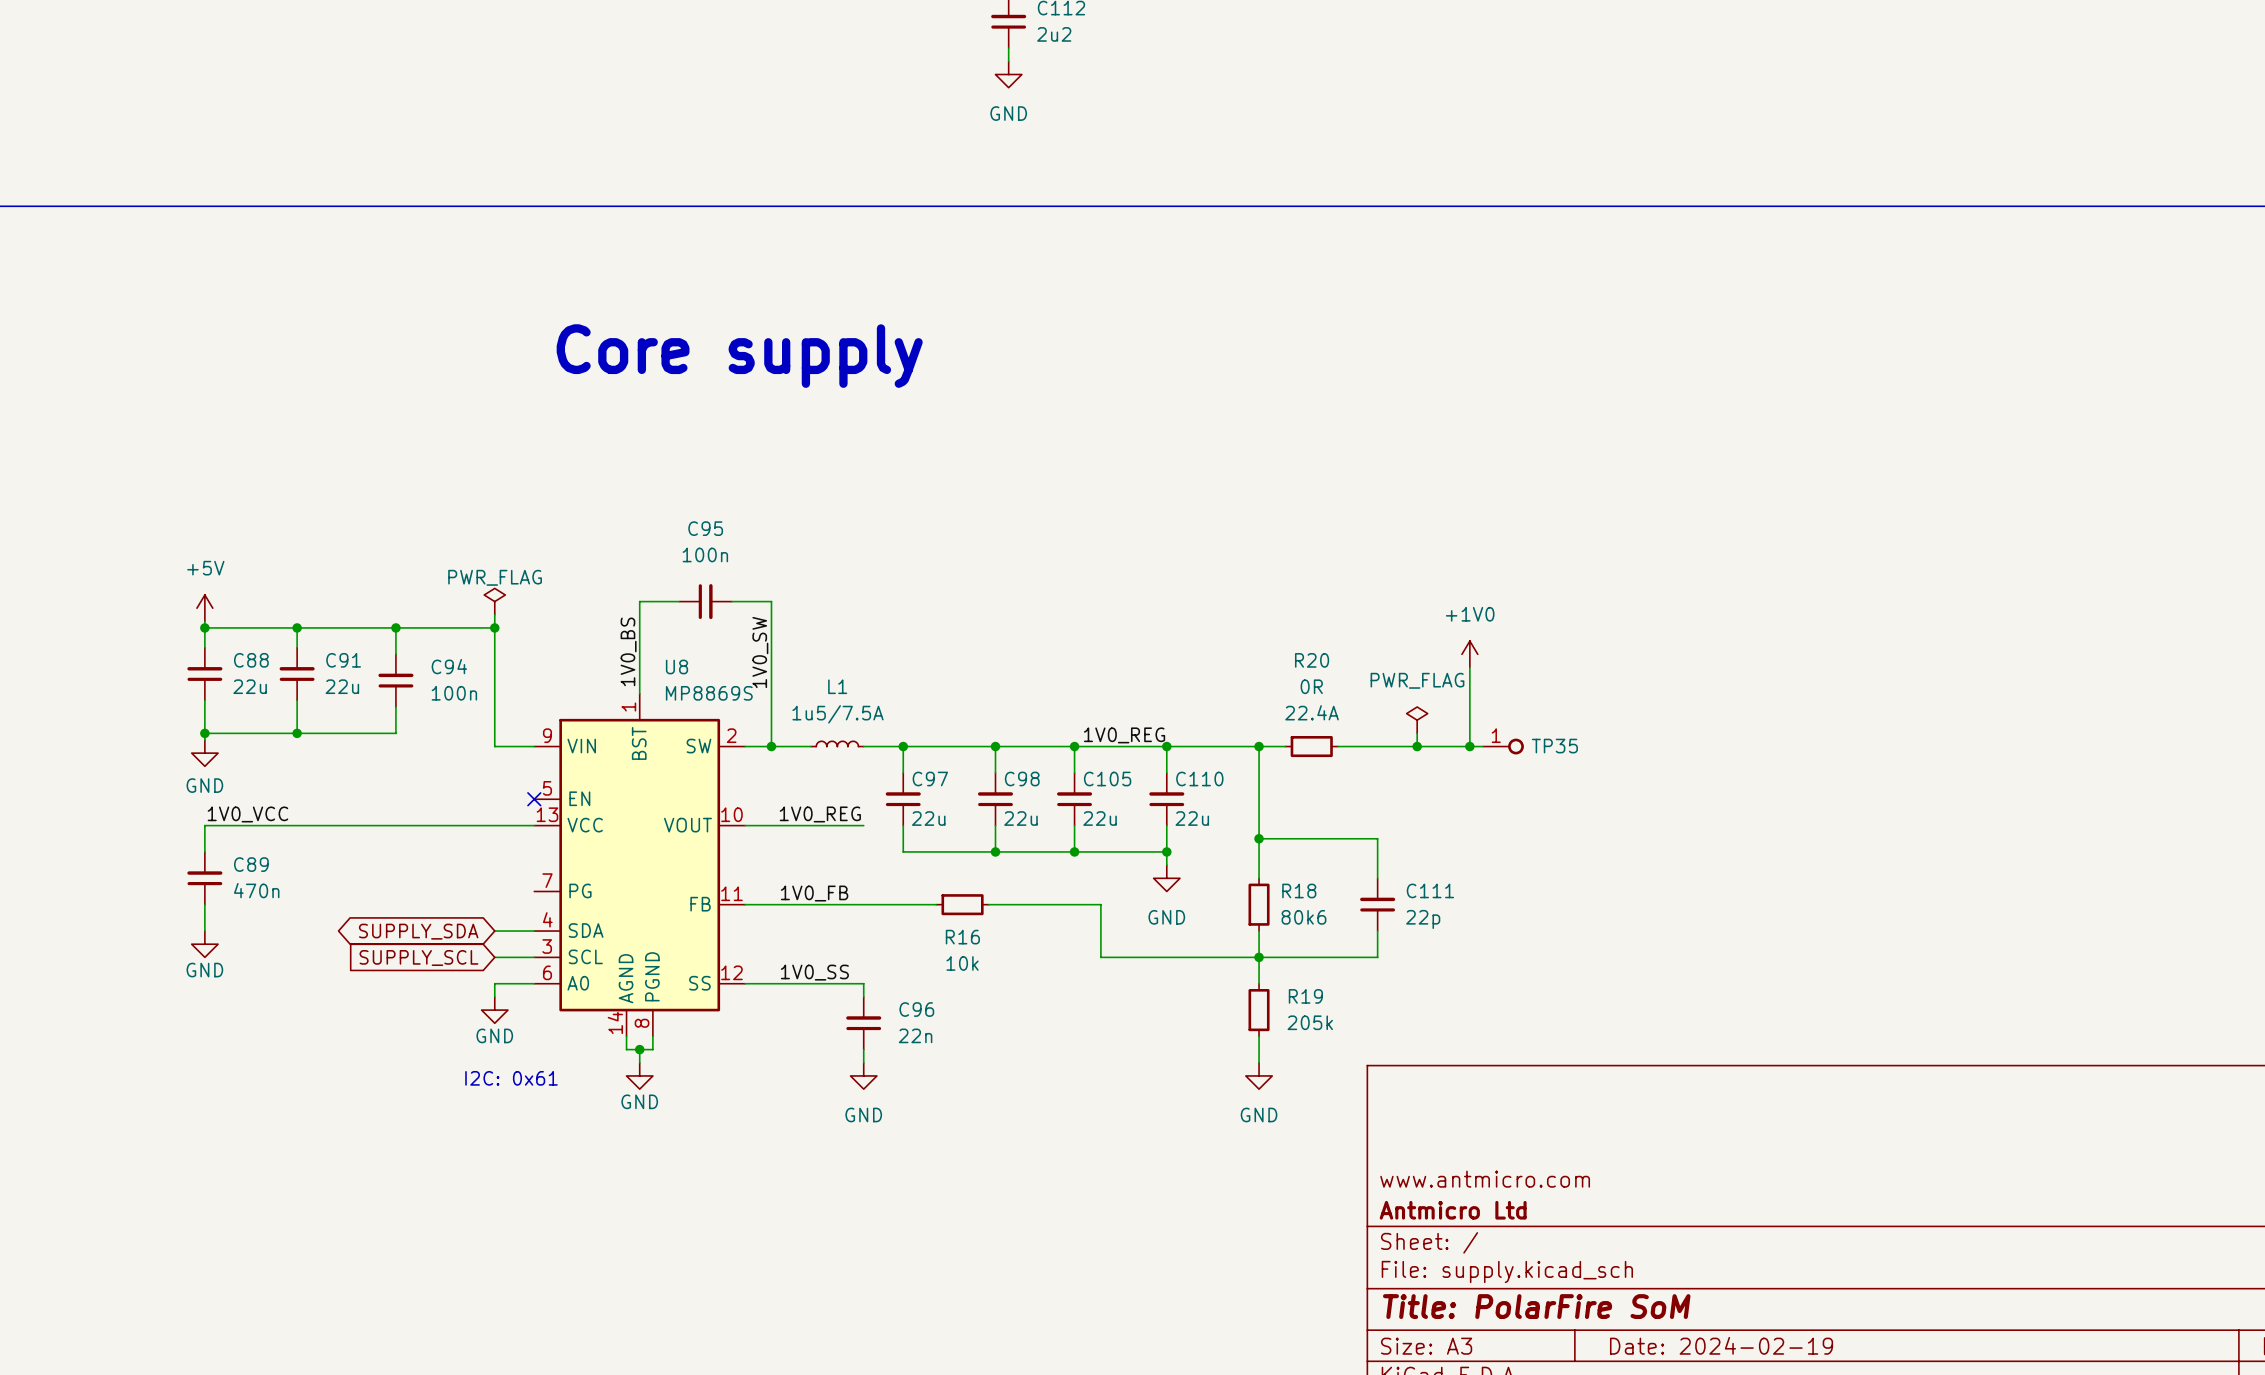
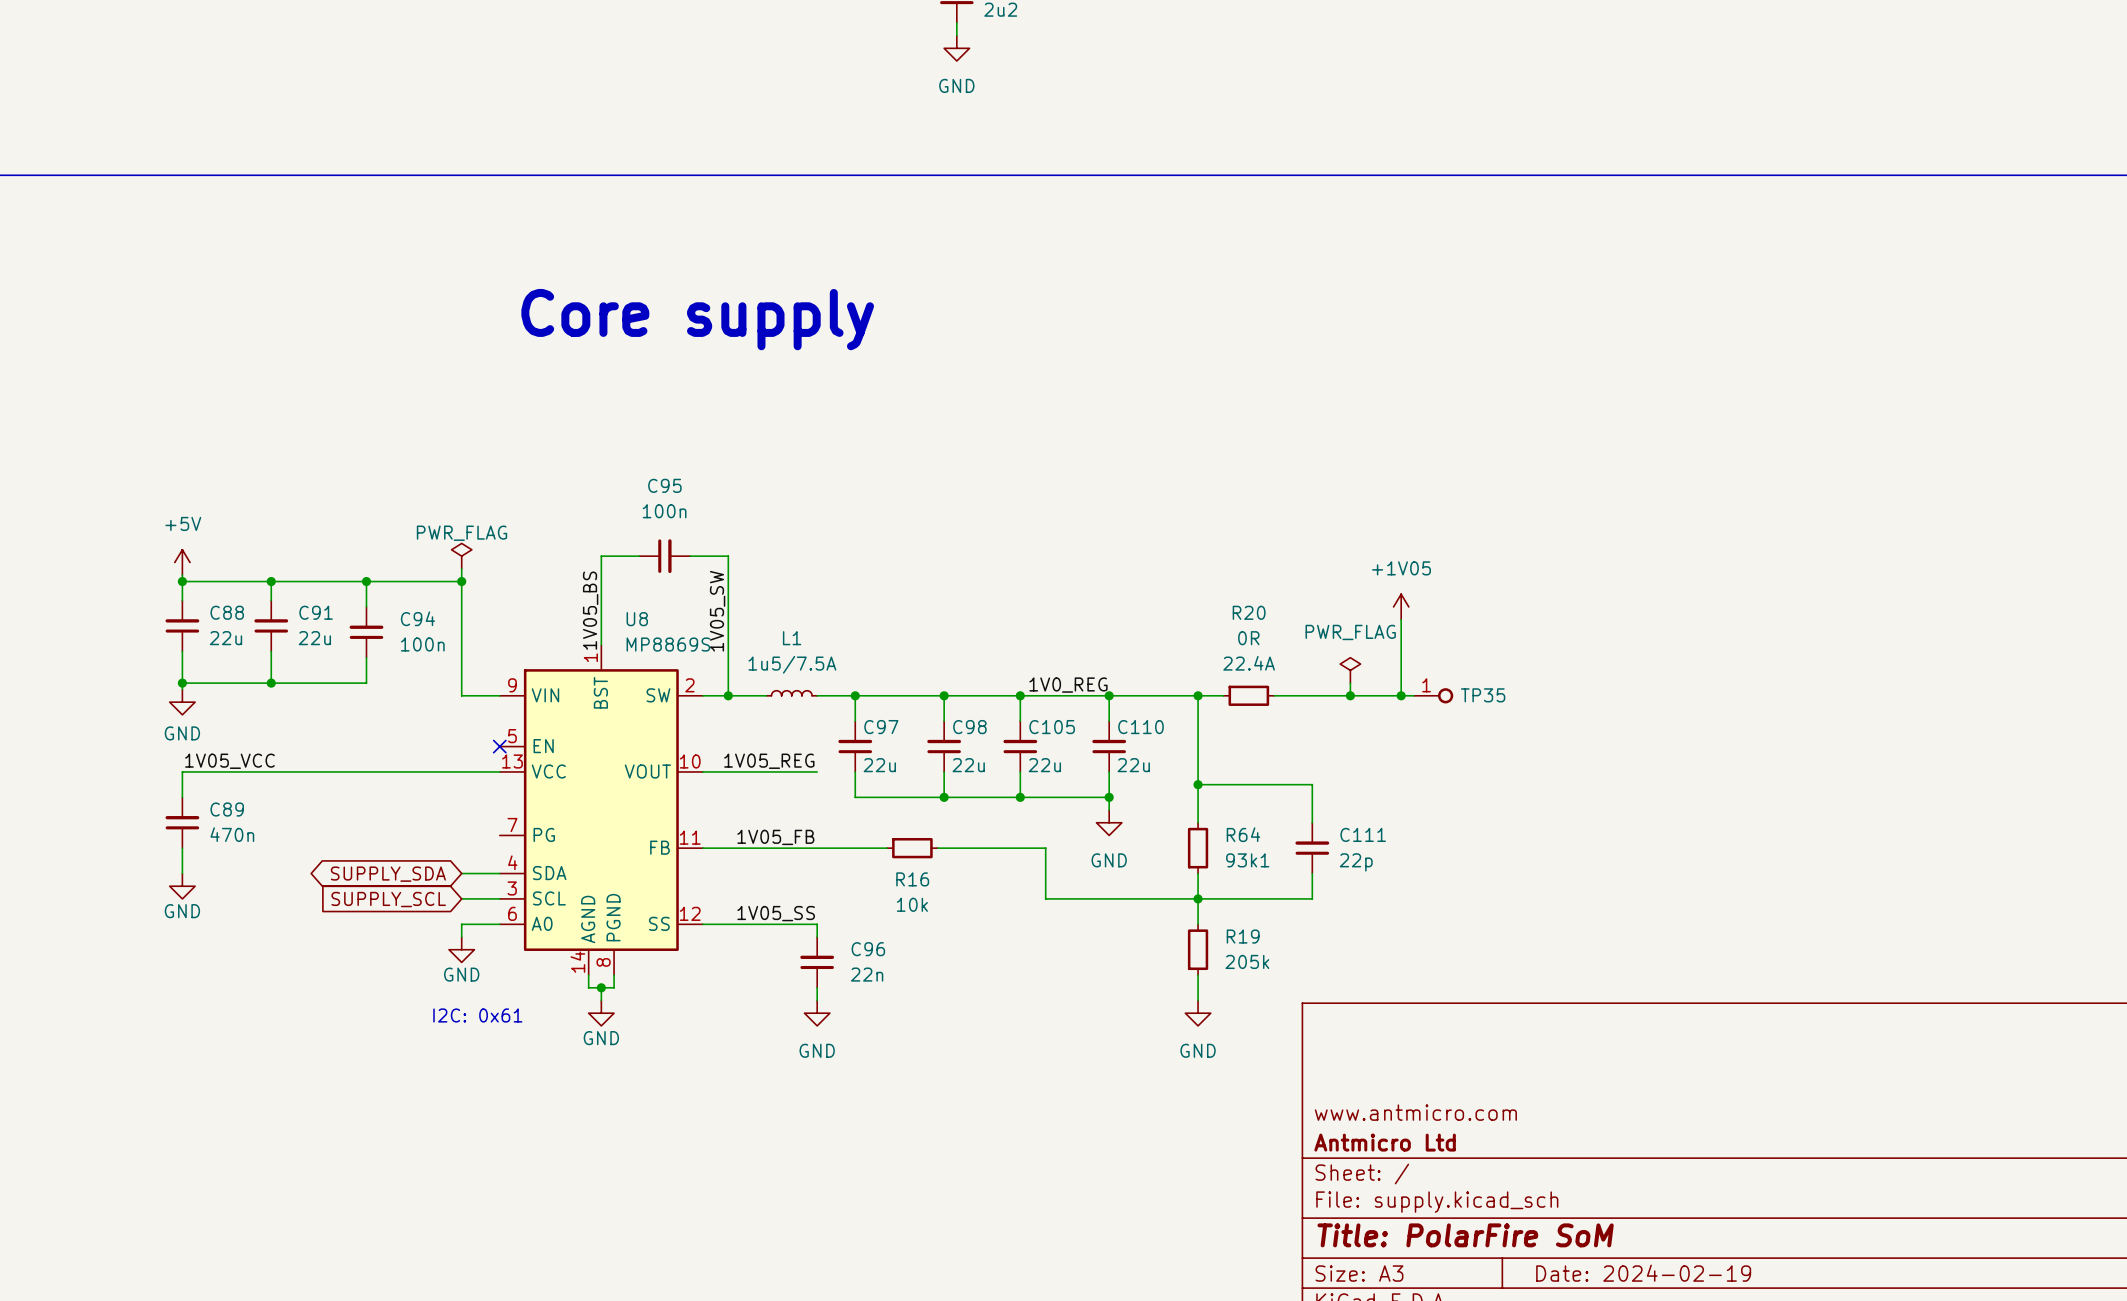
label: 1V0_BS (628, 651) -> 1V05_BS (590, 610)
label: 1V0_SW (760, 652) -> 1V05_SW (717, 611)
power symbol: +1V0 (1469, 654) -> +1V05 (1401, 606)
label: 1V0_VCC (247, 814) -> 1V05_VCC (229, 761)
label: 1V0_REG (820, 814) -> 1V05_REG (769, 761)
R18 name: R18 (1299, 890) -> R64 (1243, 834)
label: 1V0_FB (814, 893) -> 1V05_FB (775, 837)
R18 text: 80k6 (1303, 917) -> 93k1 (1247, 860)
label: 1V0_SS (814, 972) -> 1V05_SS (776, 913)

